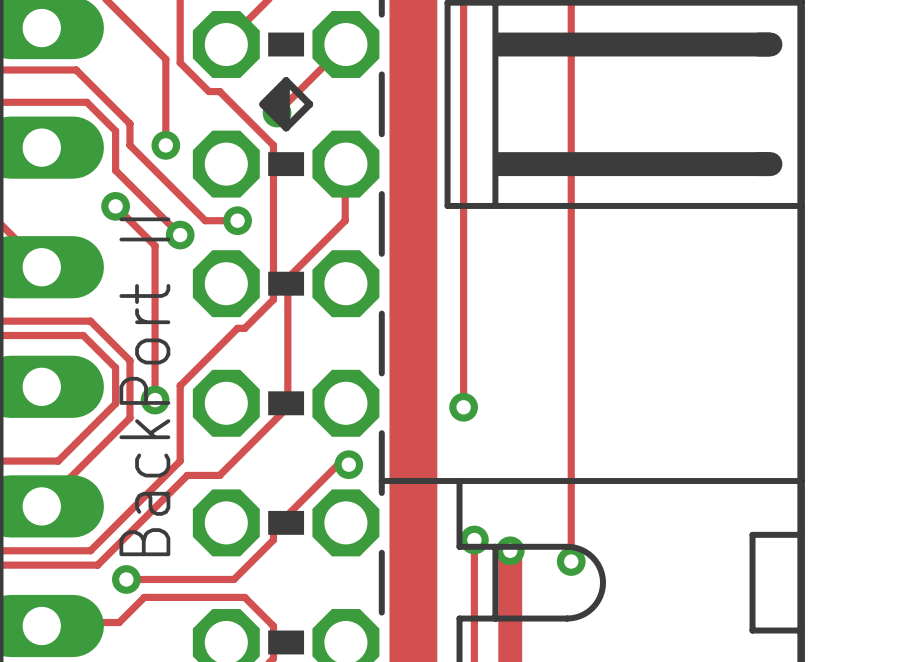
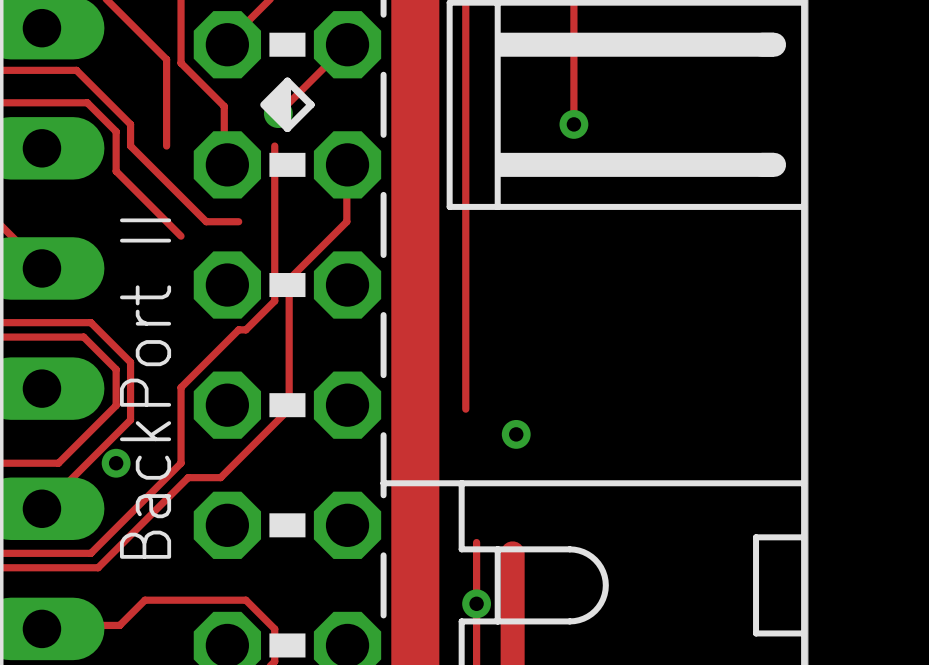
track: (208, 91) (219, 91) (273, 145) -> (209, 91) (224, 106) (224, 164) (227, 164)
track: (571, 123) (571, 561) -> none
via: none -> (573, 124)
via: (165, 145) -> none
track: (115, 206) (155, 245) (155, 400) -> none
via: (115, 206) -> none
via: (237, 220) -> none
via: (180, 235) -> none
via: (155, 400) -> none
via position: (463, 407) -> (516, 434)
via: none -> (116, 463)
track: (348, 464) (338, 464) (273, 529) (273, 540) (234, 579) (126, 579) -> none
via: (348, 464) -> none
via: (474, 540) -> none
via: (510, 550) -> none
via: (571, 561) -> none
via: (126, 579) -> none
via: none -> (476, 603)

